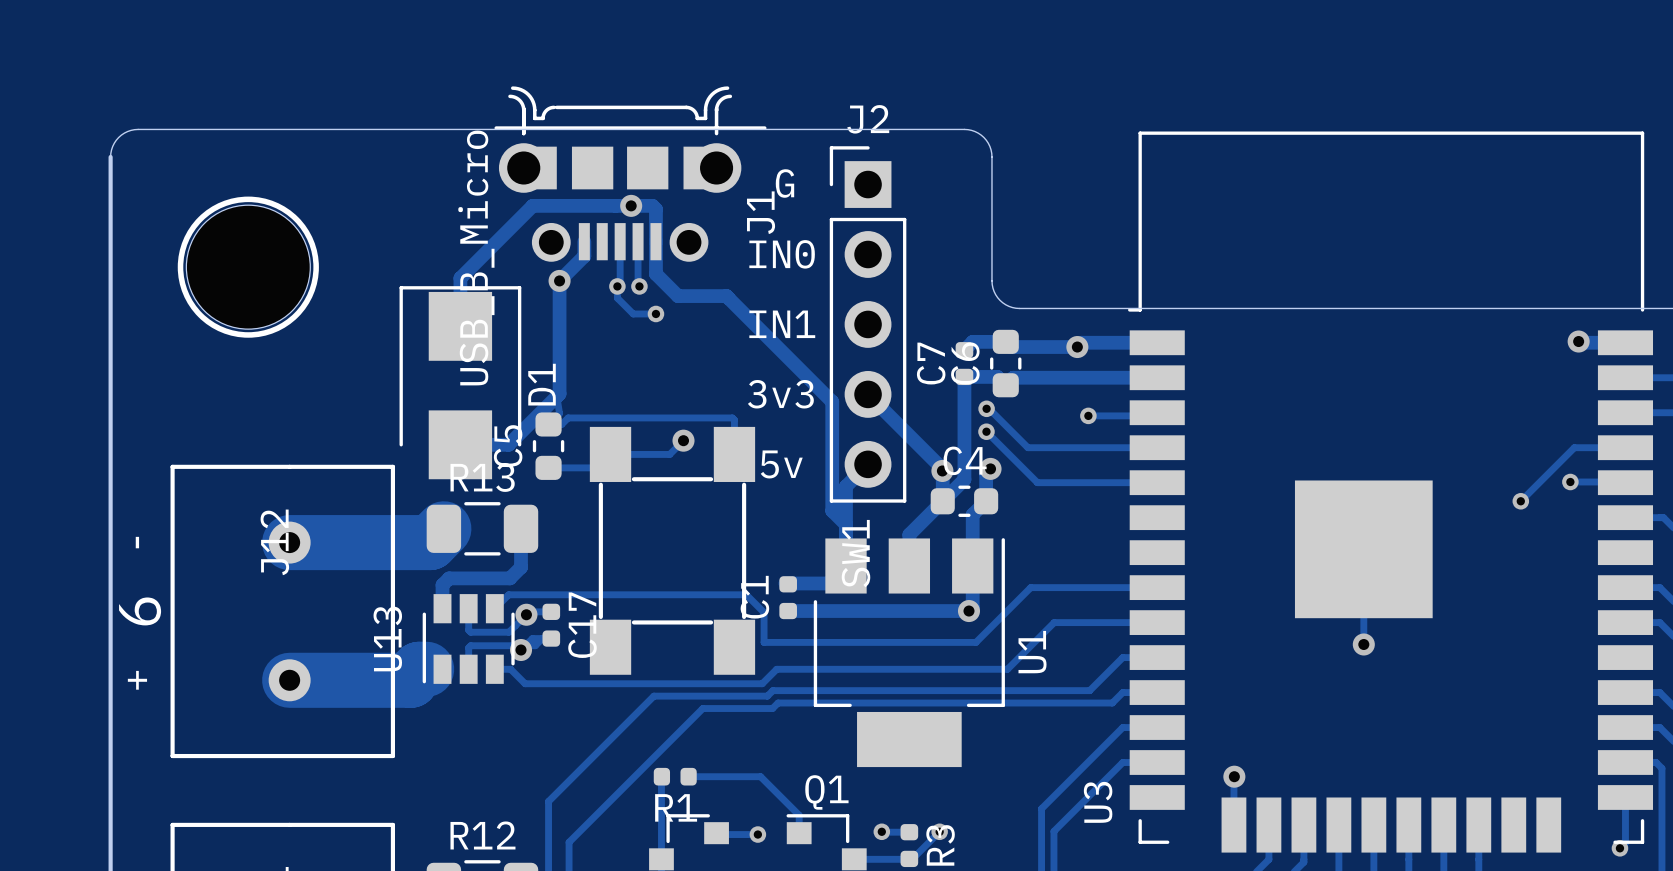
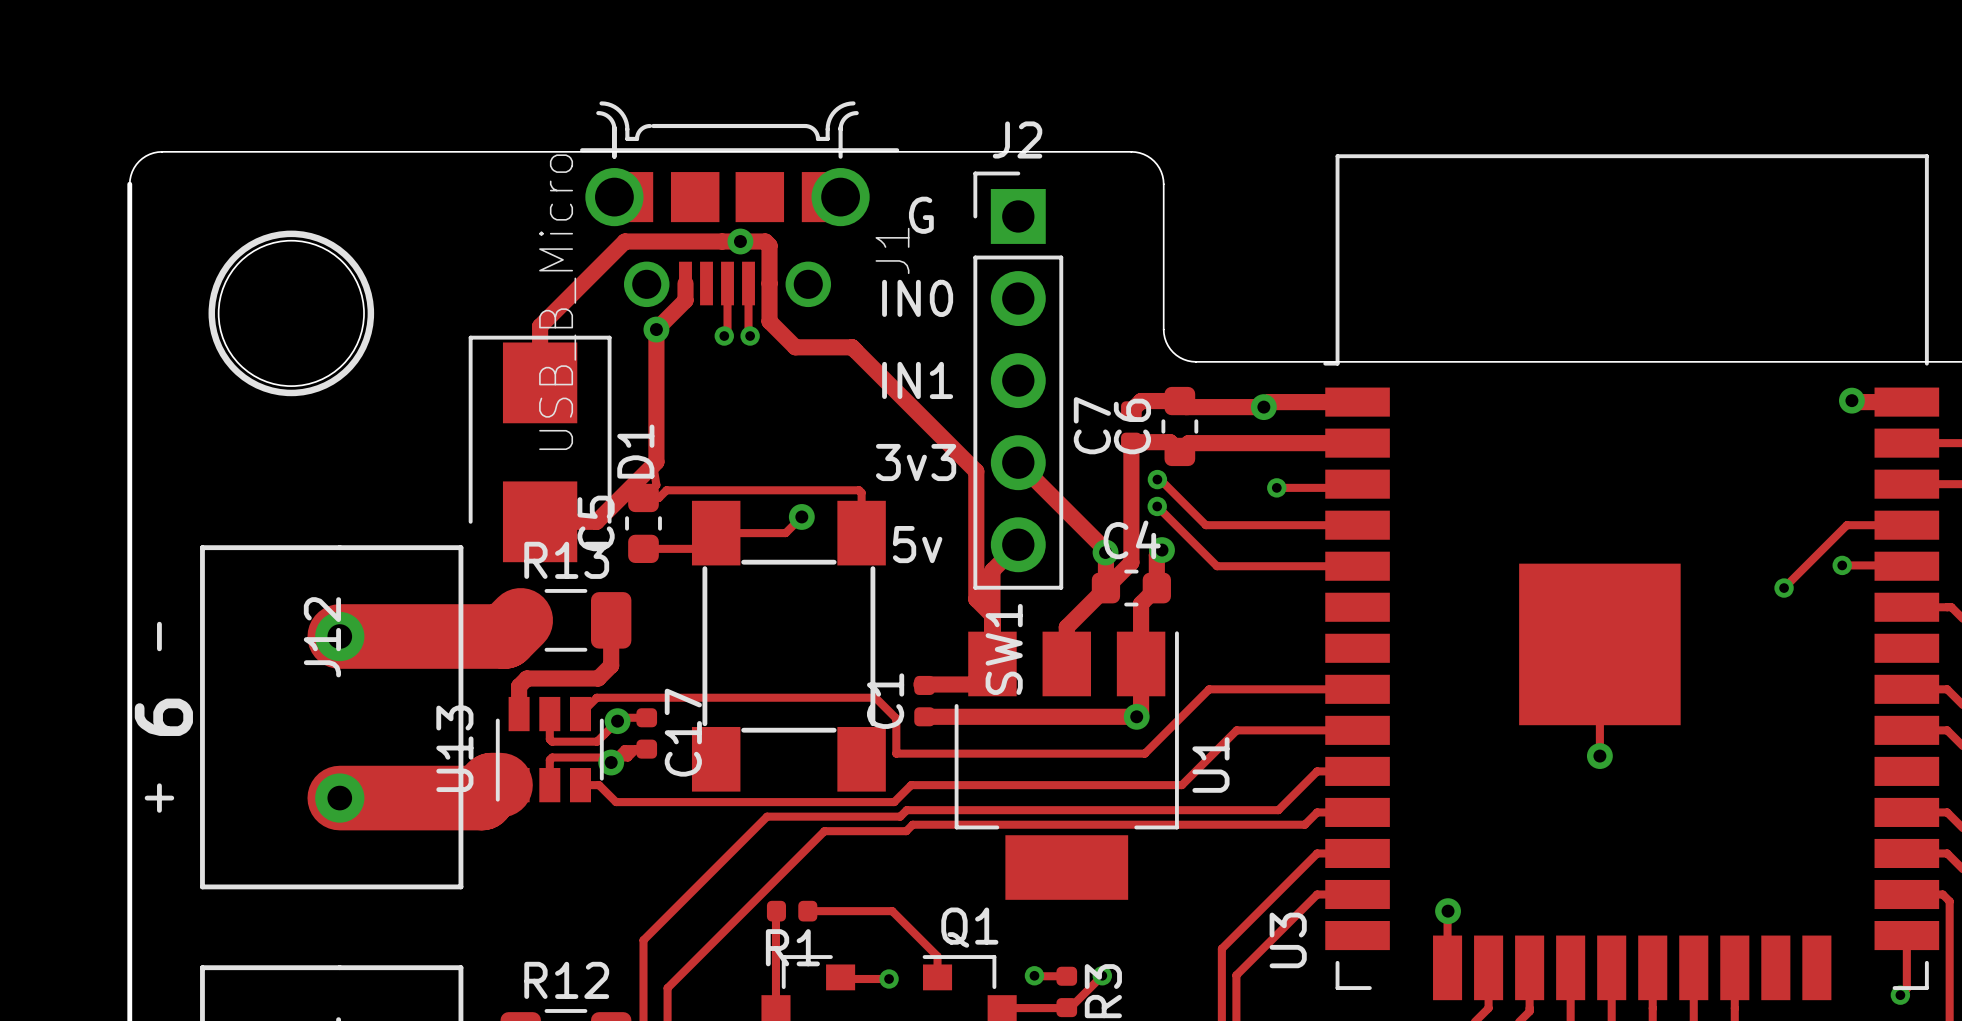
track: (617, 286) (617, 298) (633, 313) (655, 313) -> none
via: (655, 313) -> none

